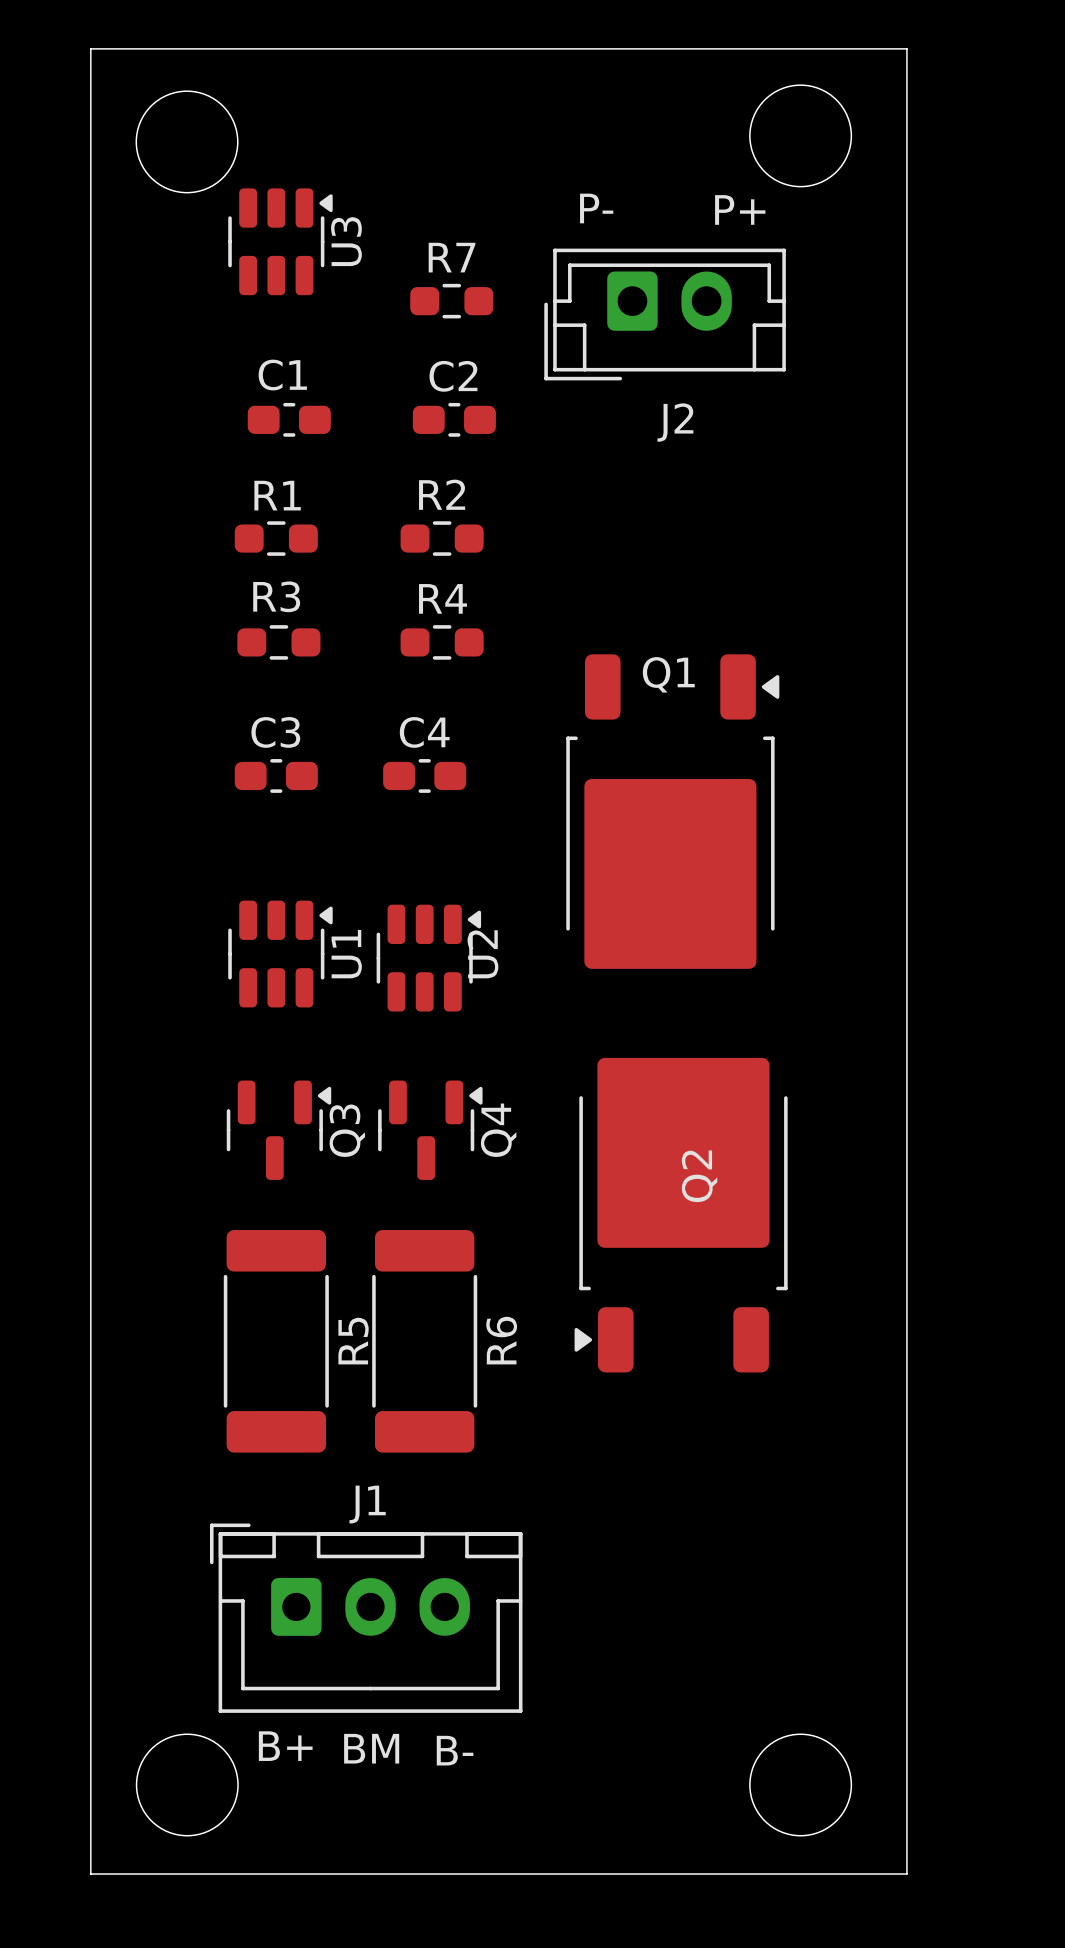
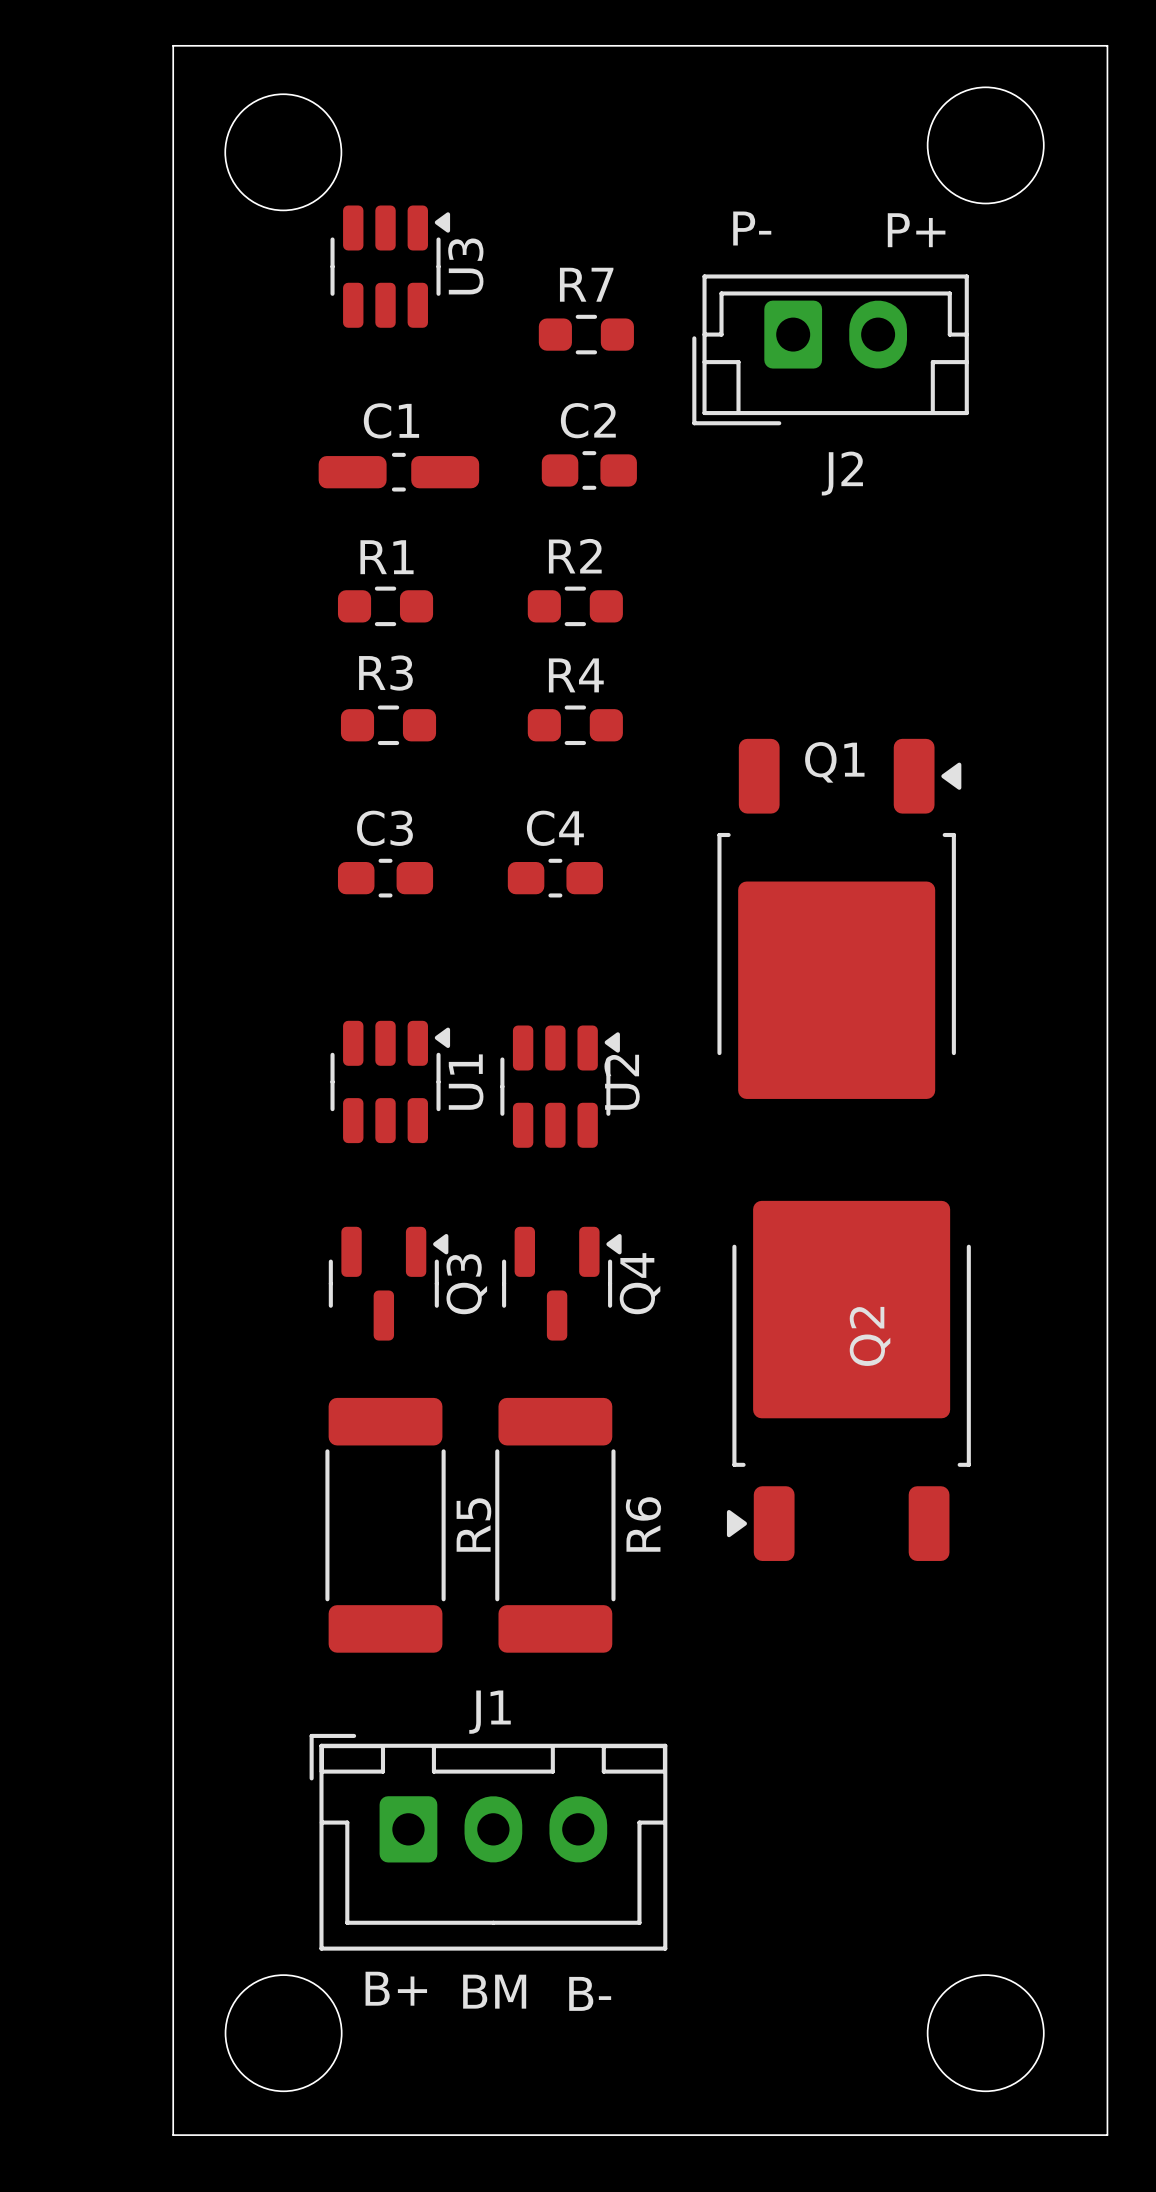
C1 footprint: [247, 402, 331, 437] -> [318, 452, 480, 492]

